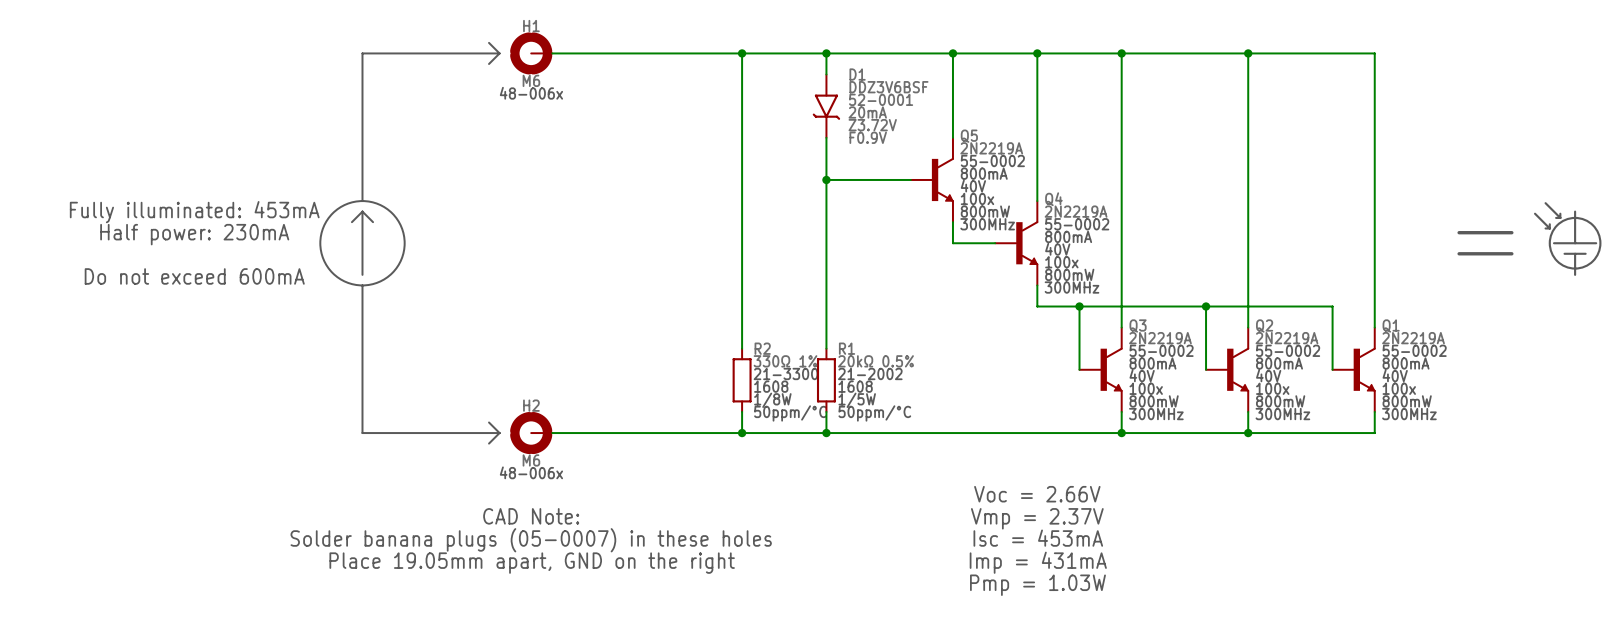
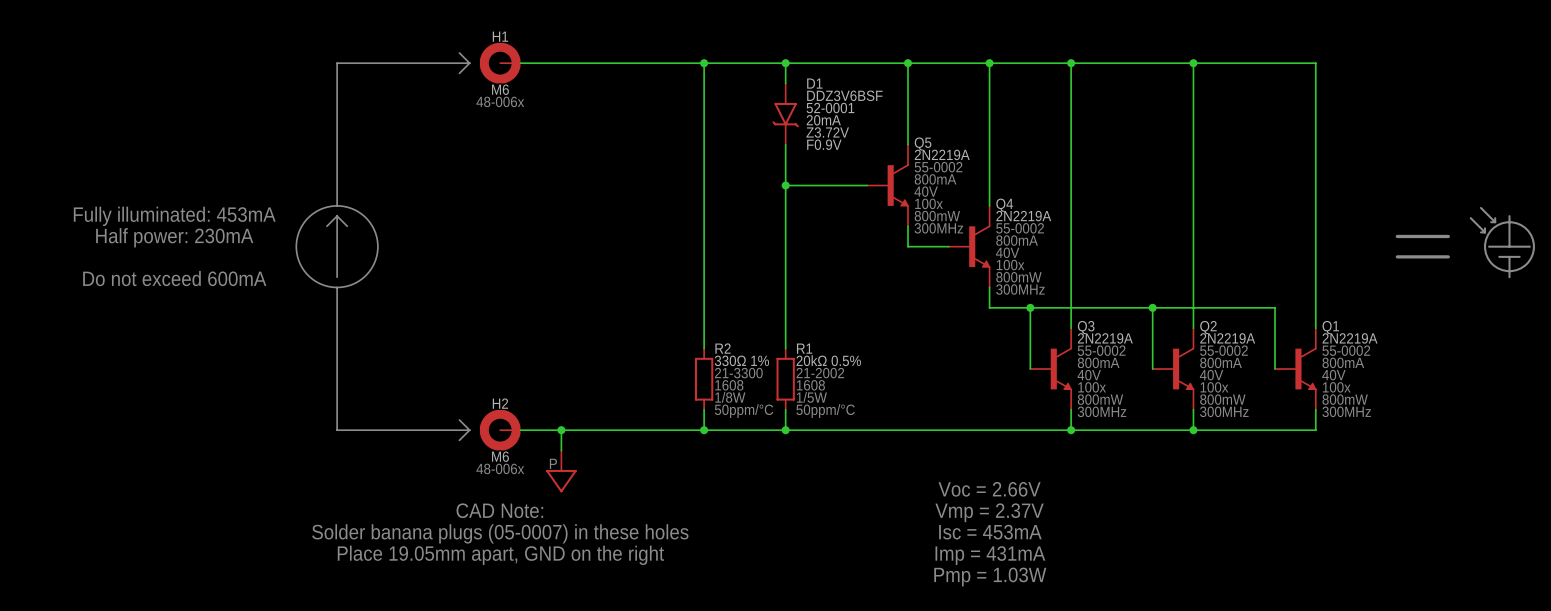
wire: none -> (561, 430) (561, 450)
junction: none -> (561, 430)
power symbol: none -> (561, 471)

